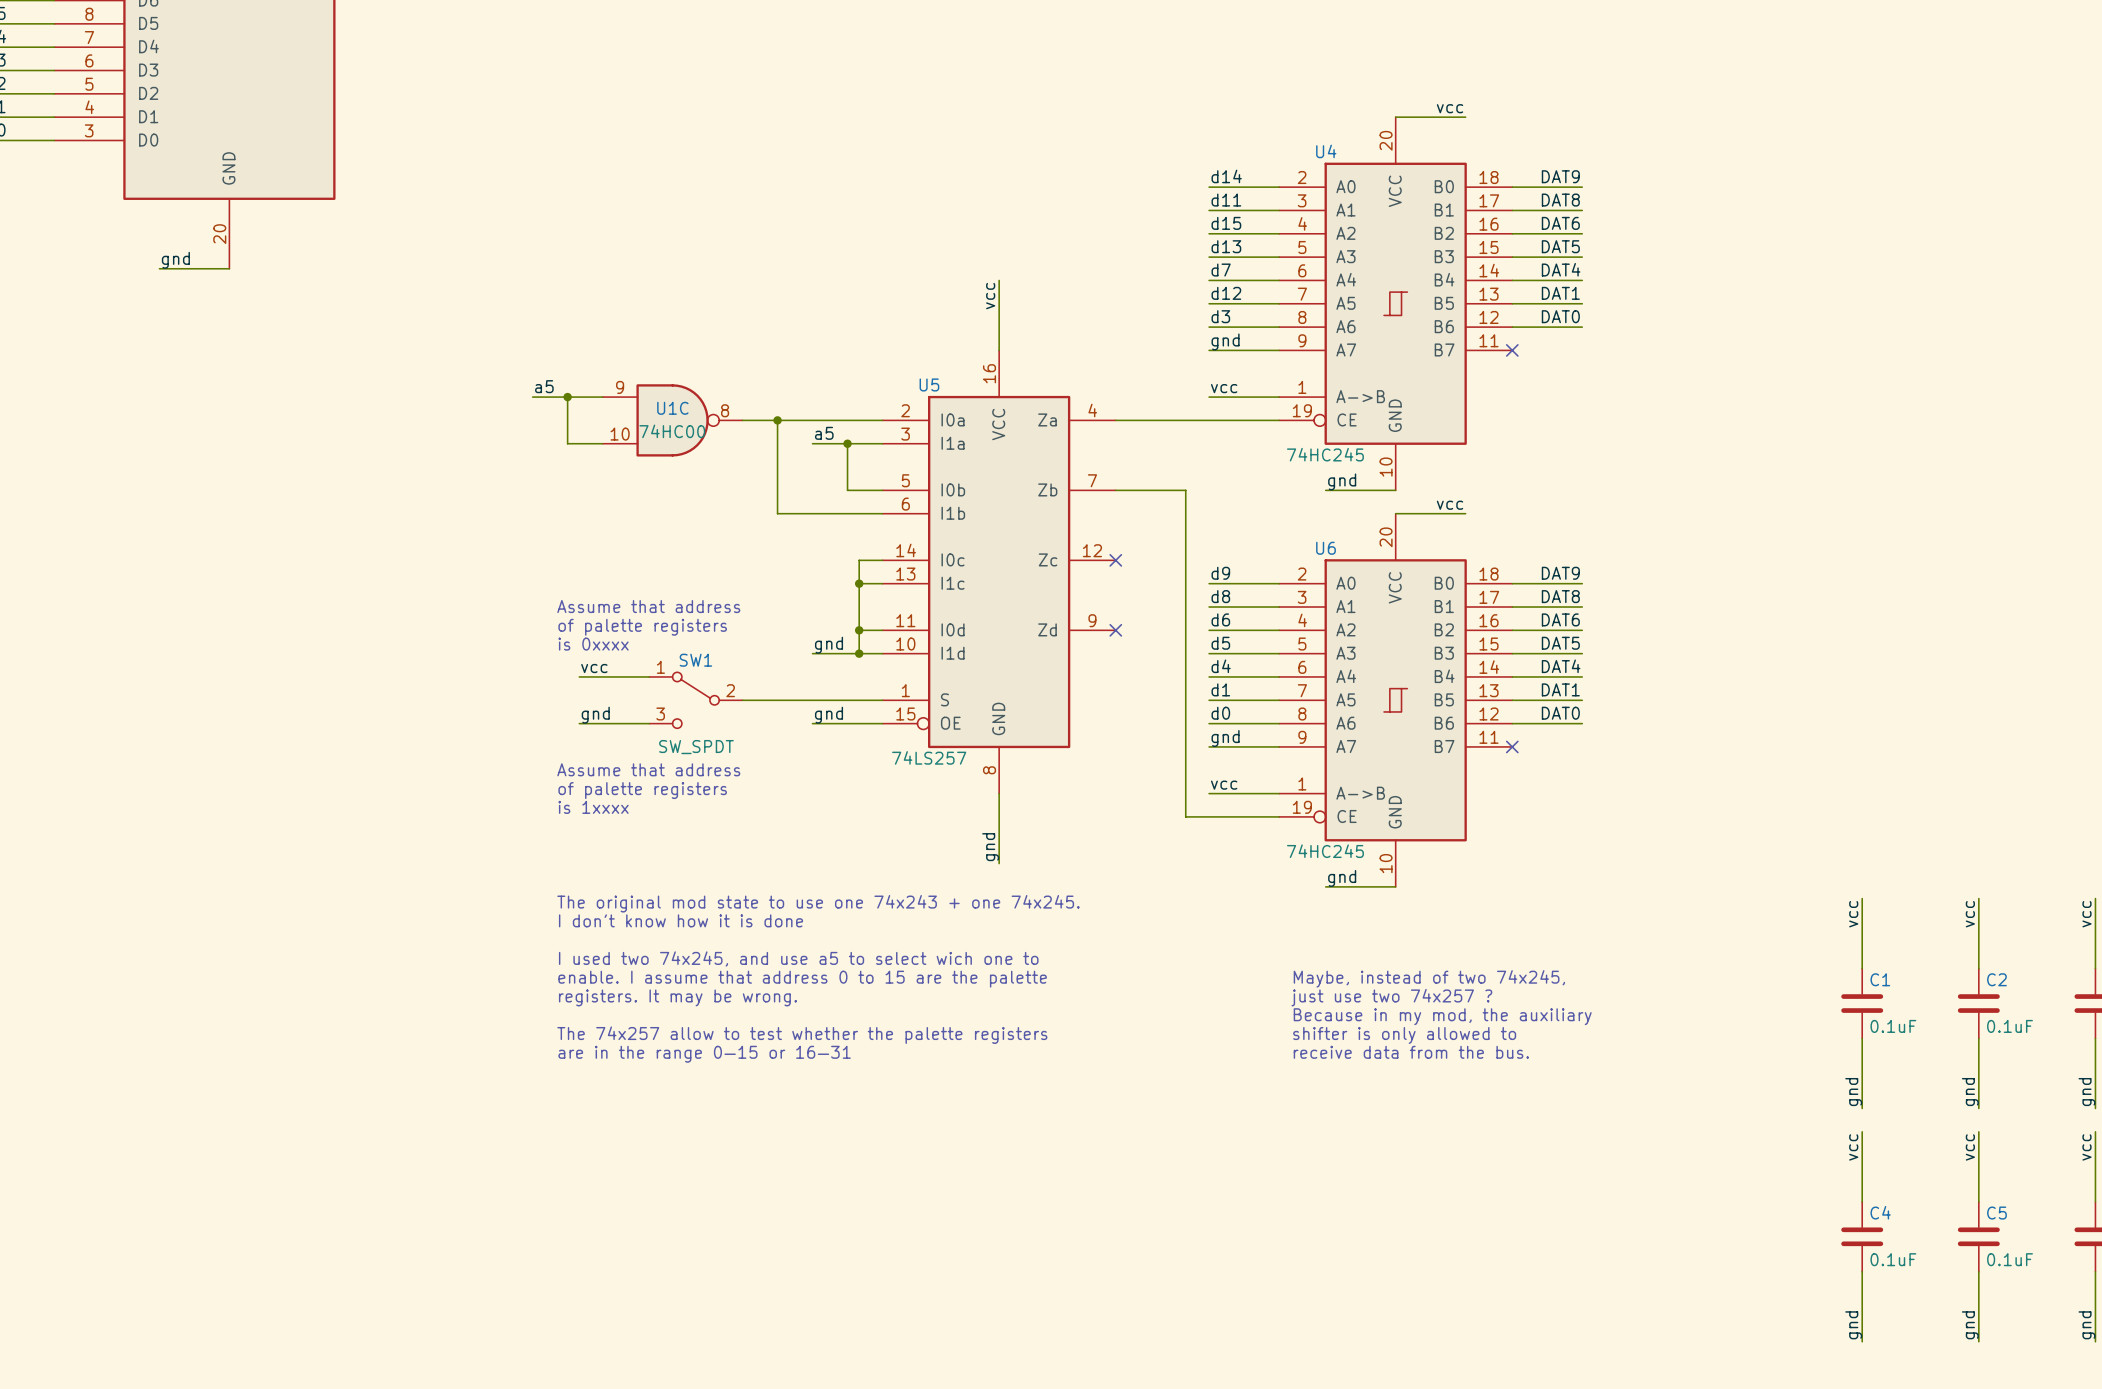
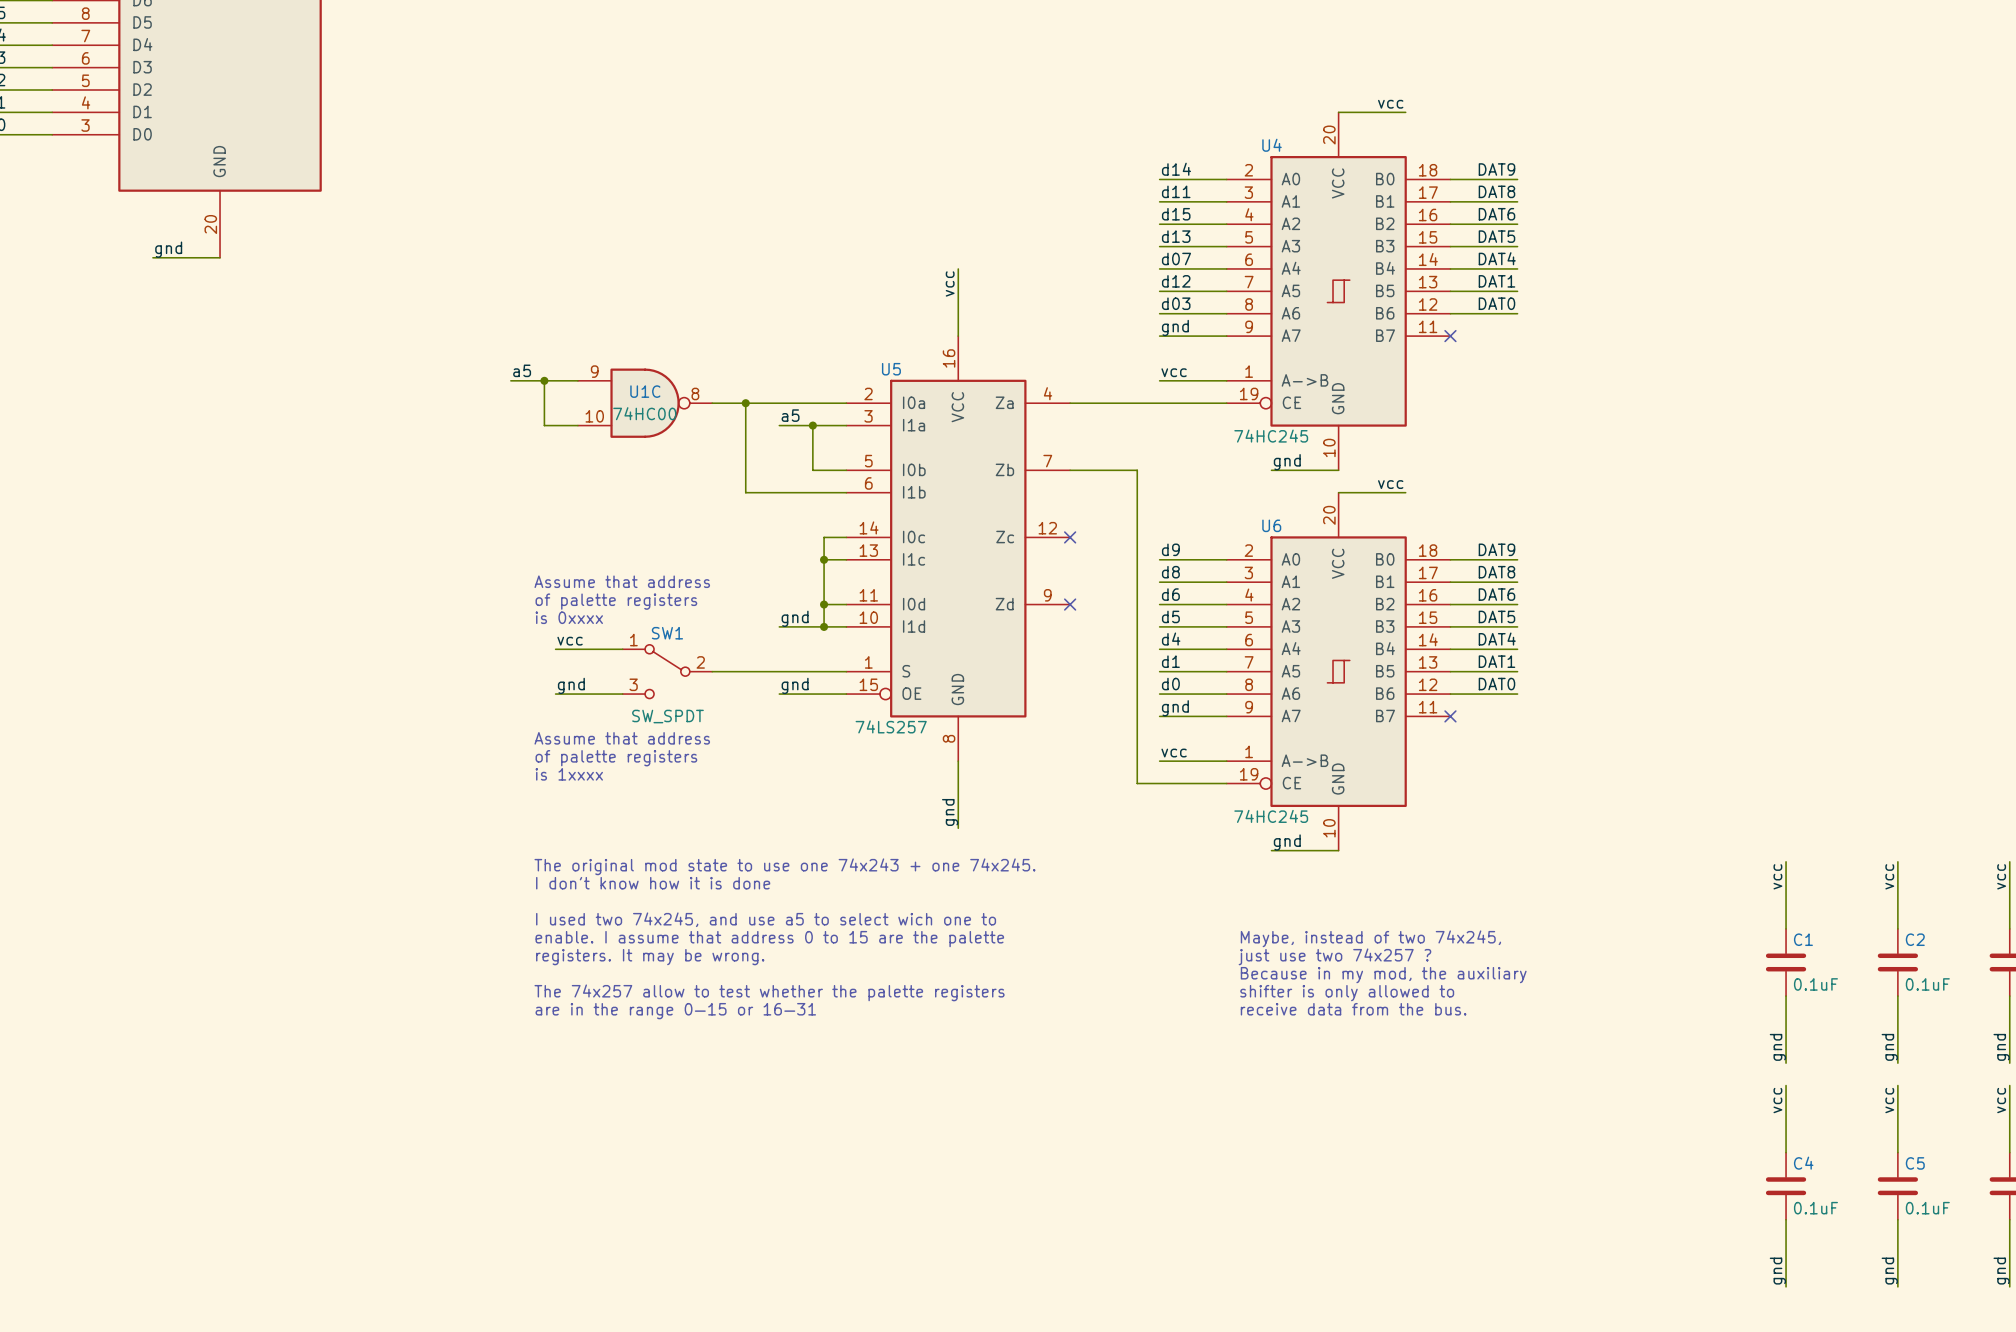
label: d7 (1221, 270) -> d07 (1176, 258)
label: d3 (1220, 316) -> d03 (1176, 303)

